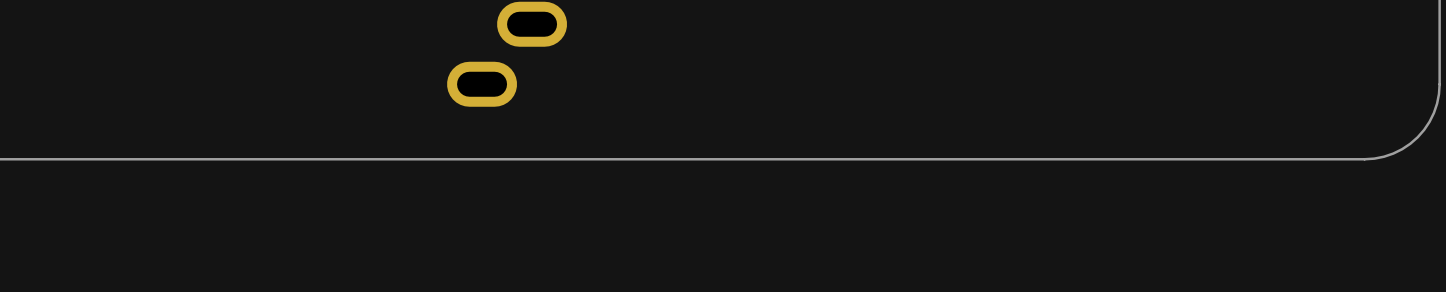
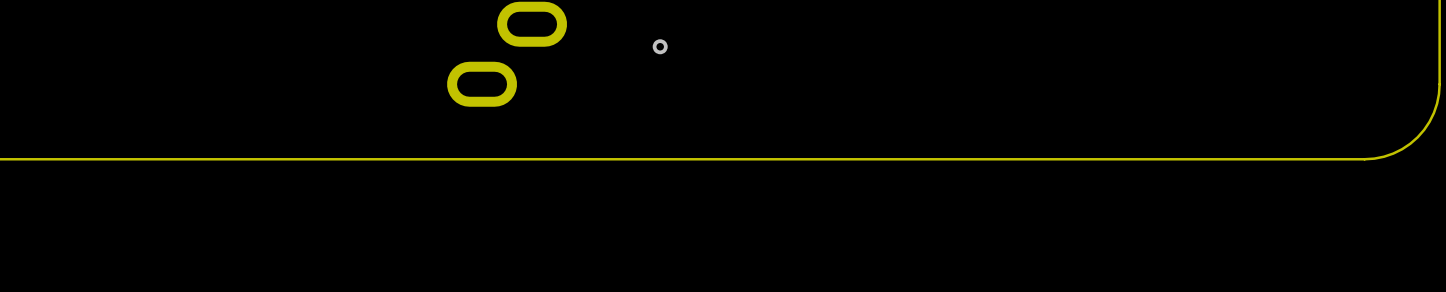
via: none -> (660, 46)

